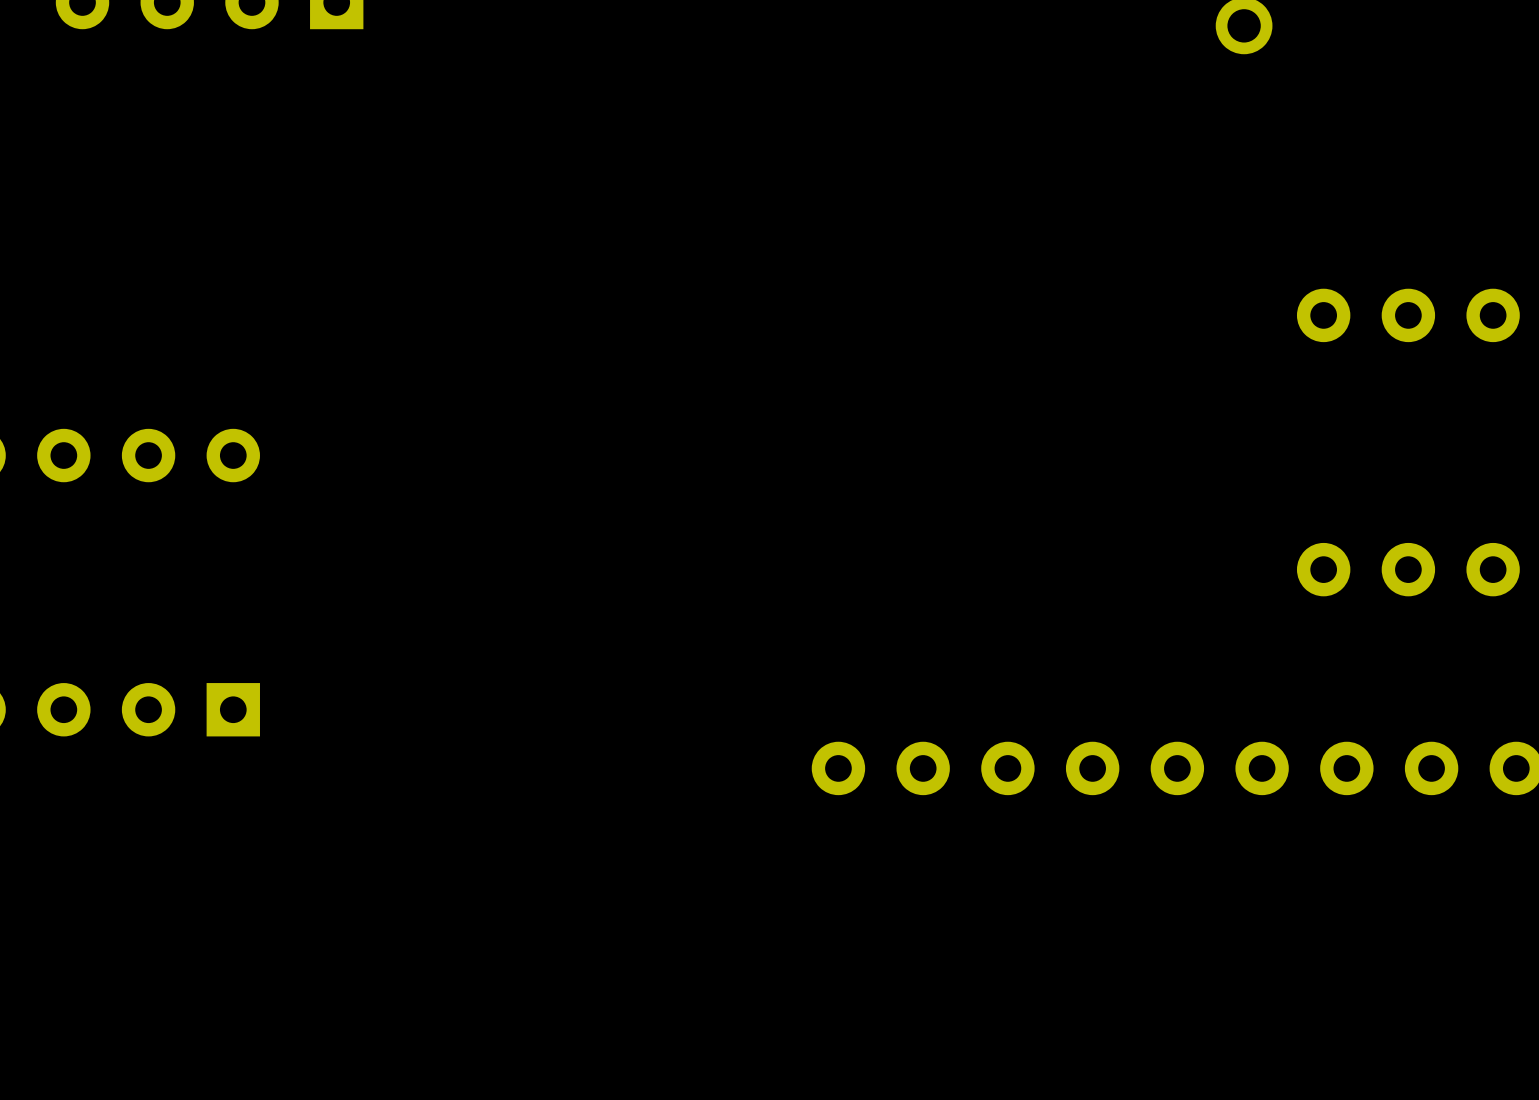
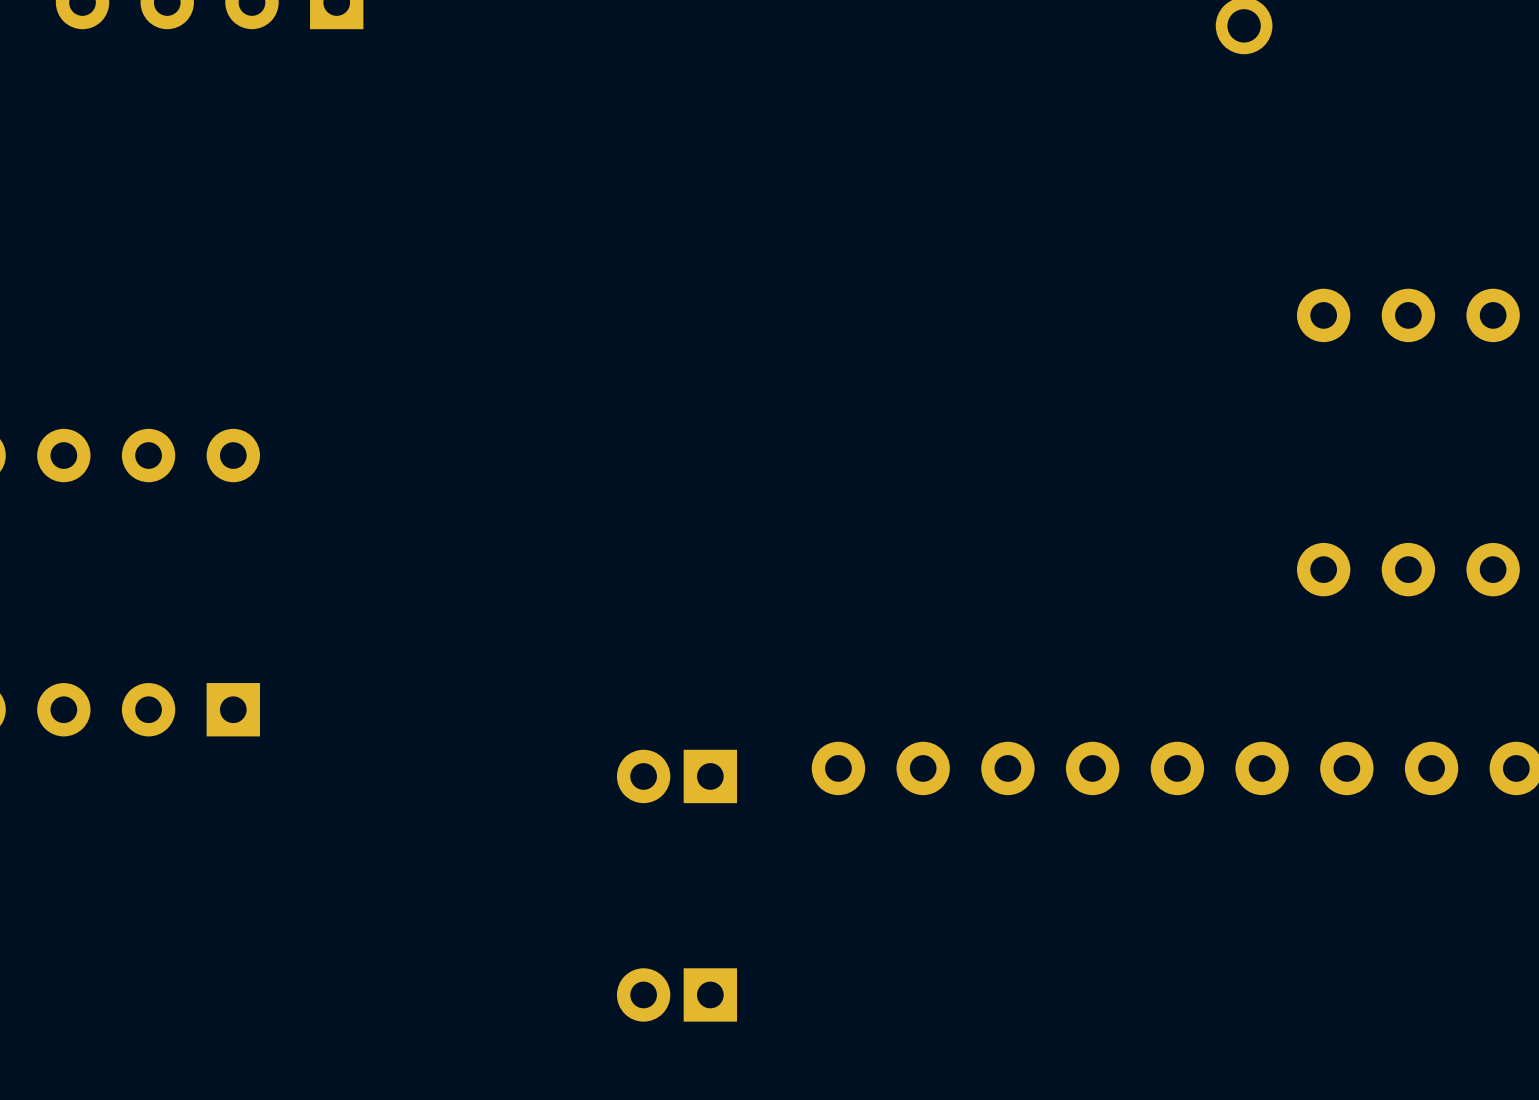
part: none -> (676, 776)
part: none -> (676, 994)

